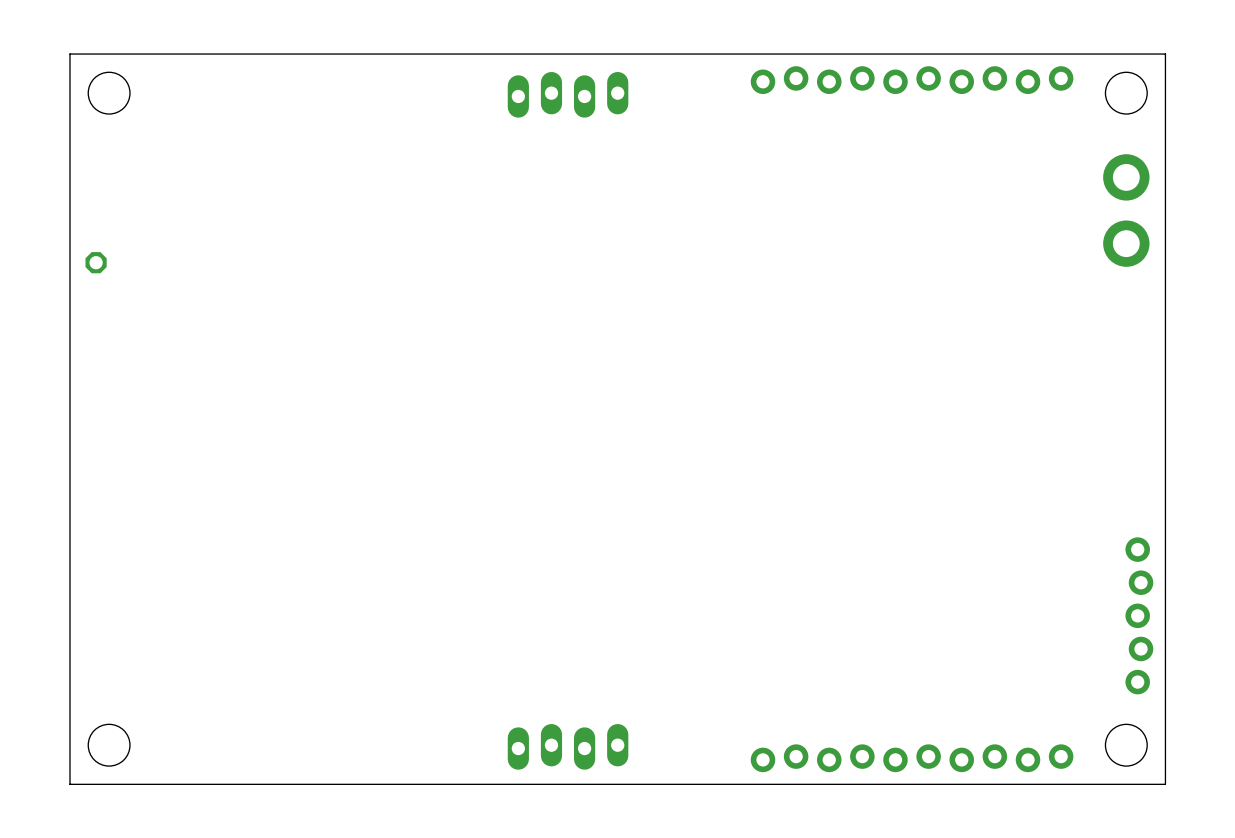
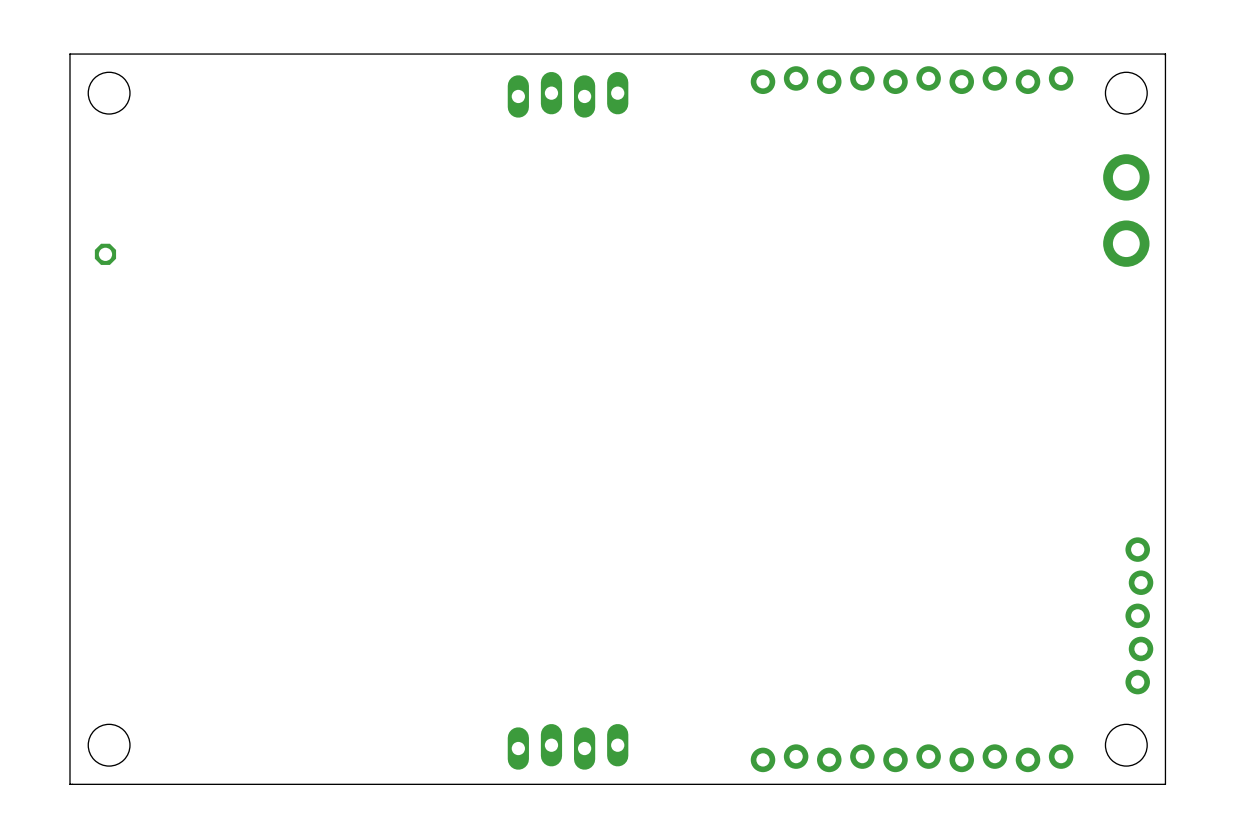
part position: (96, 262) -> (105, 254)

